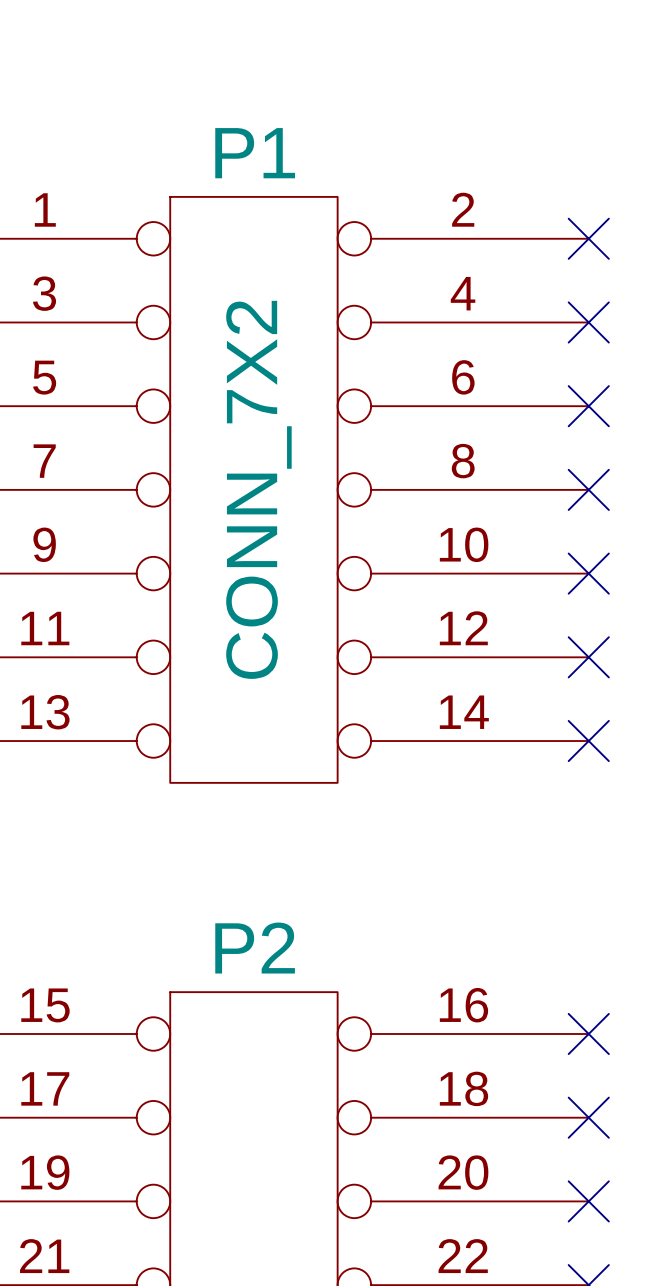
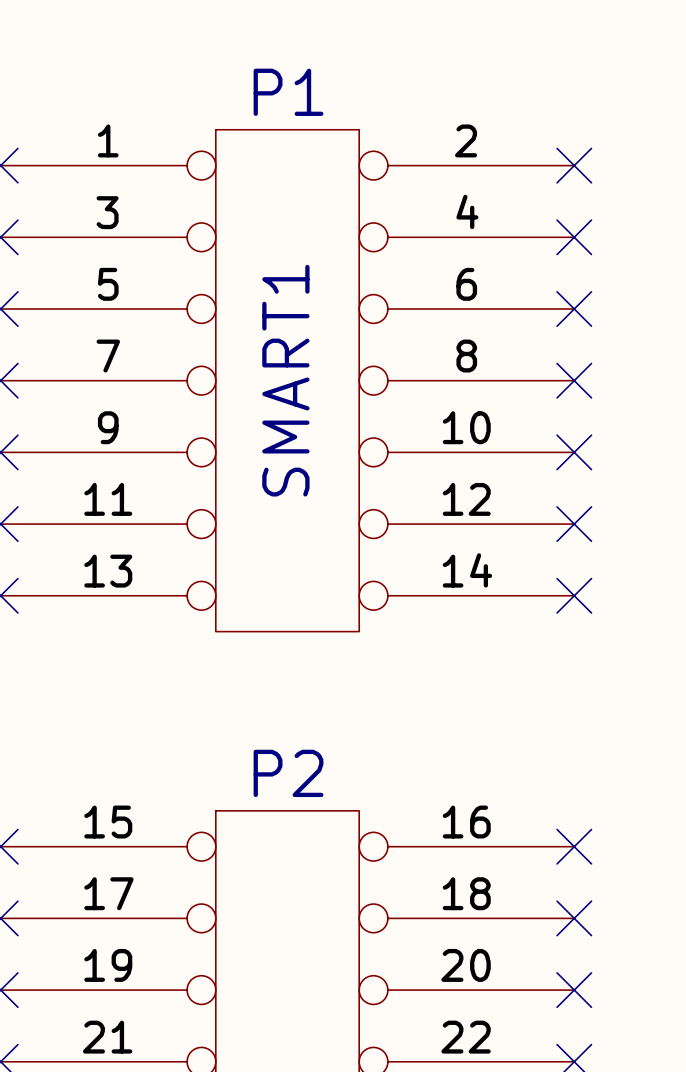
P1 value: CONN_7X2 (258, 489) -> SMART1 (285, 380)

